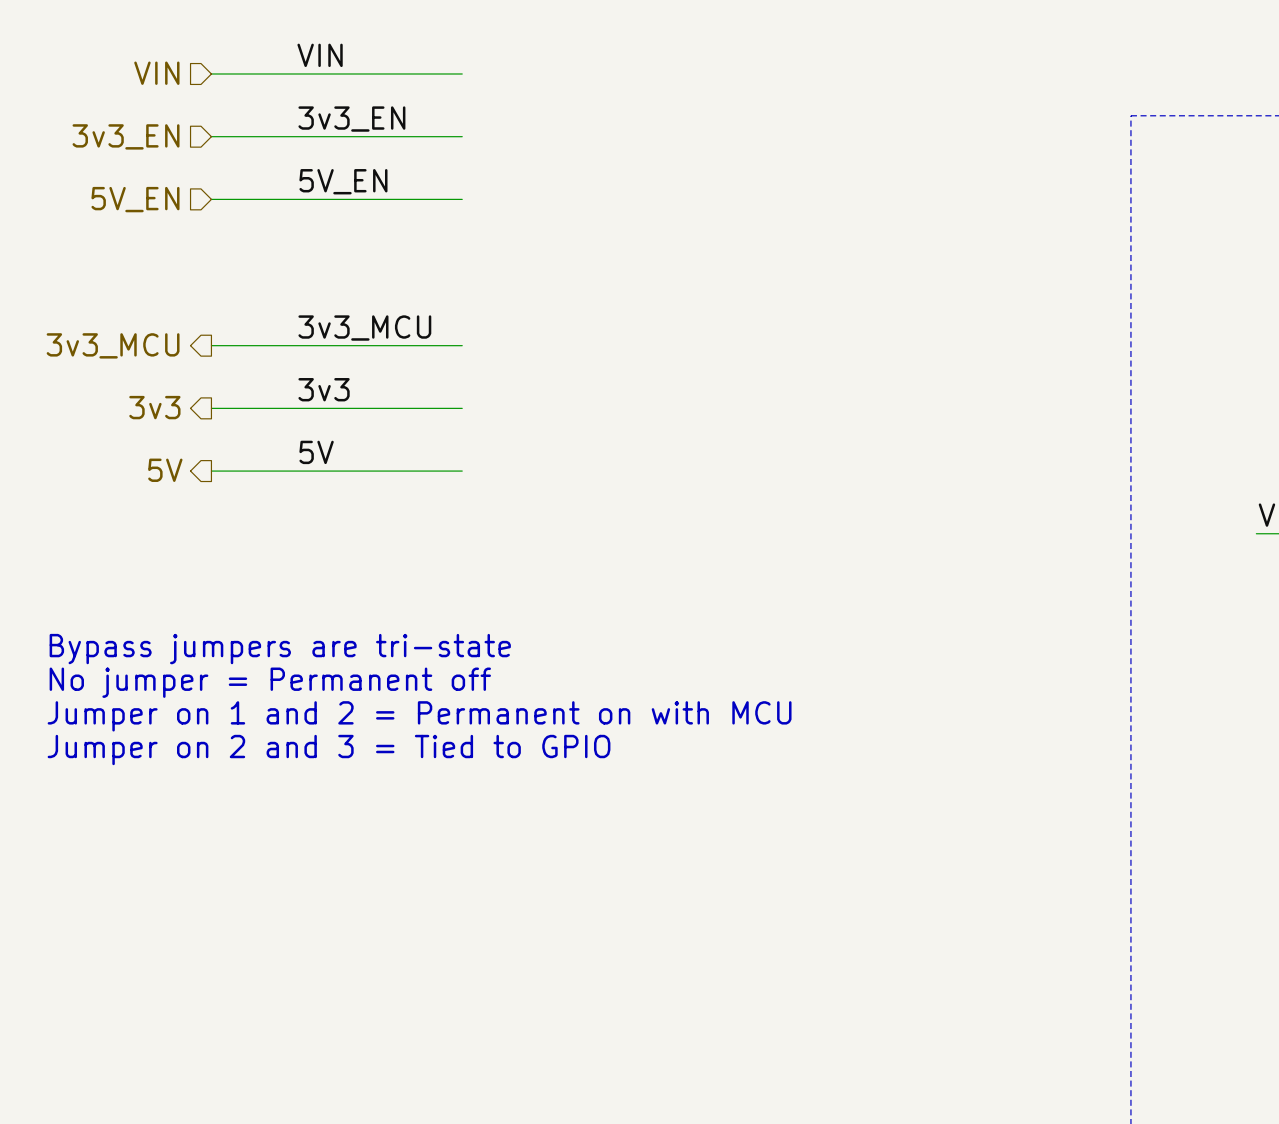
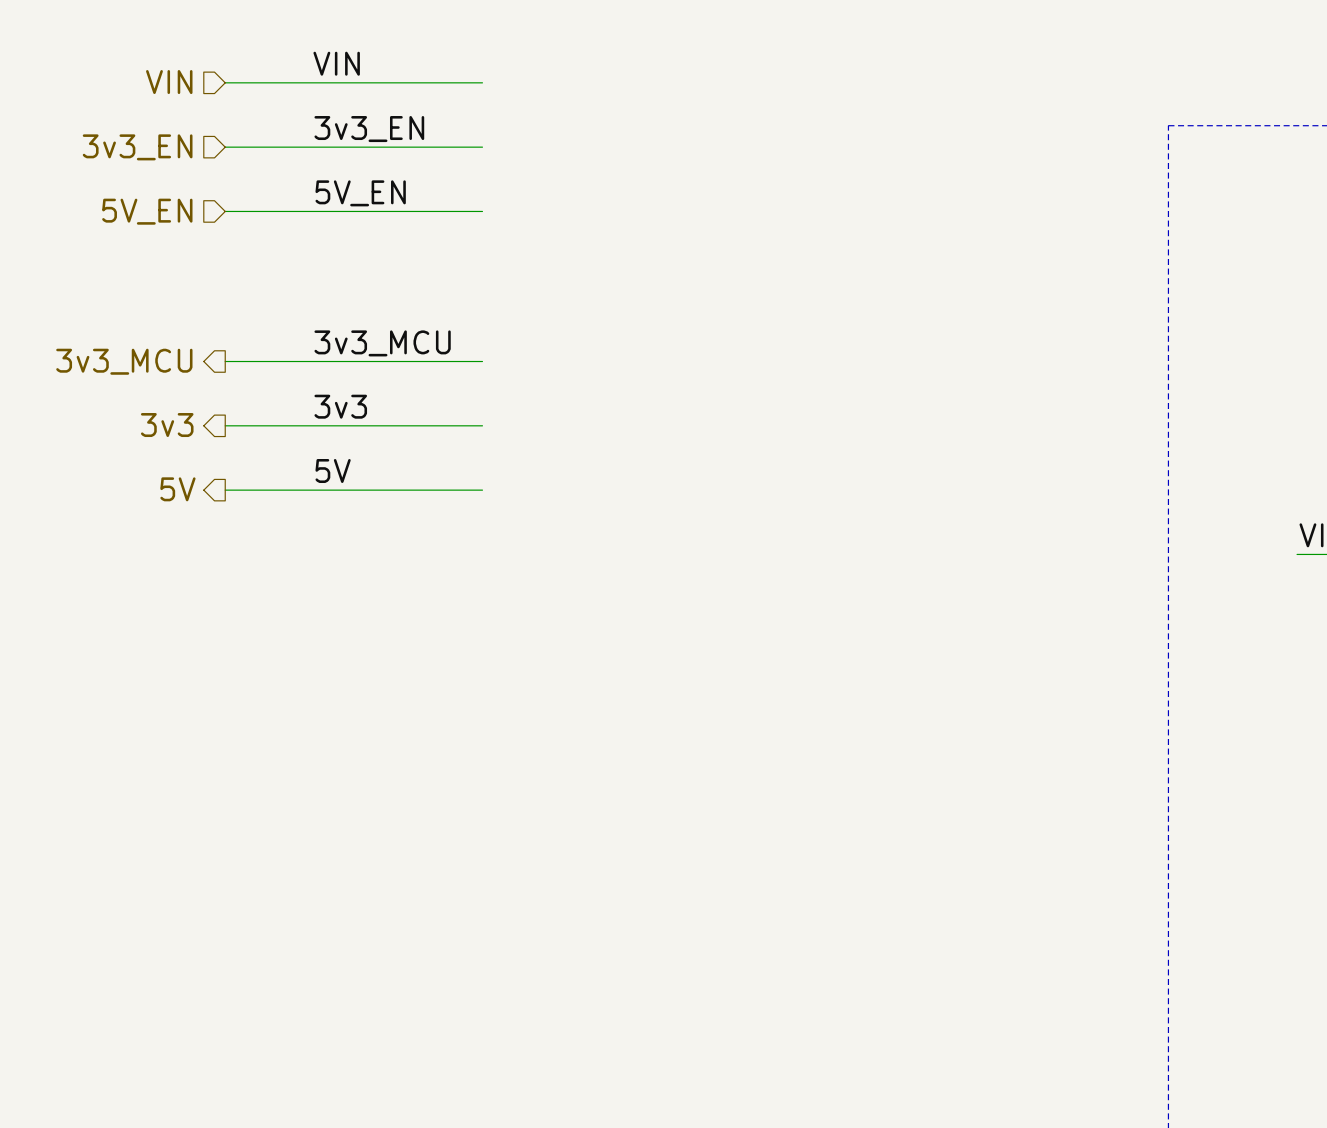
text: Bypass jumpers are tri-state (280, 649) -> none
text: No jumper = Permanent off (270, 682) -> none
text: Jumper on 1 and 2 = Permanent on with MCU (419, 716) -> none
text: Jumper on 2 and 3 = Tied to GPIO (329, 750) -> none

